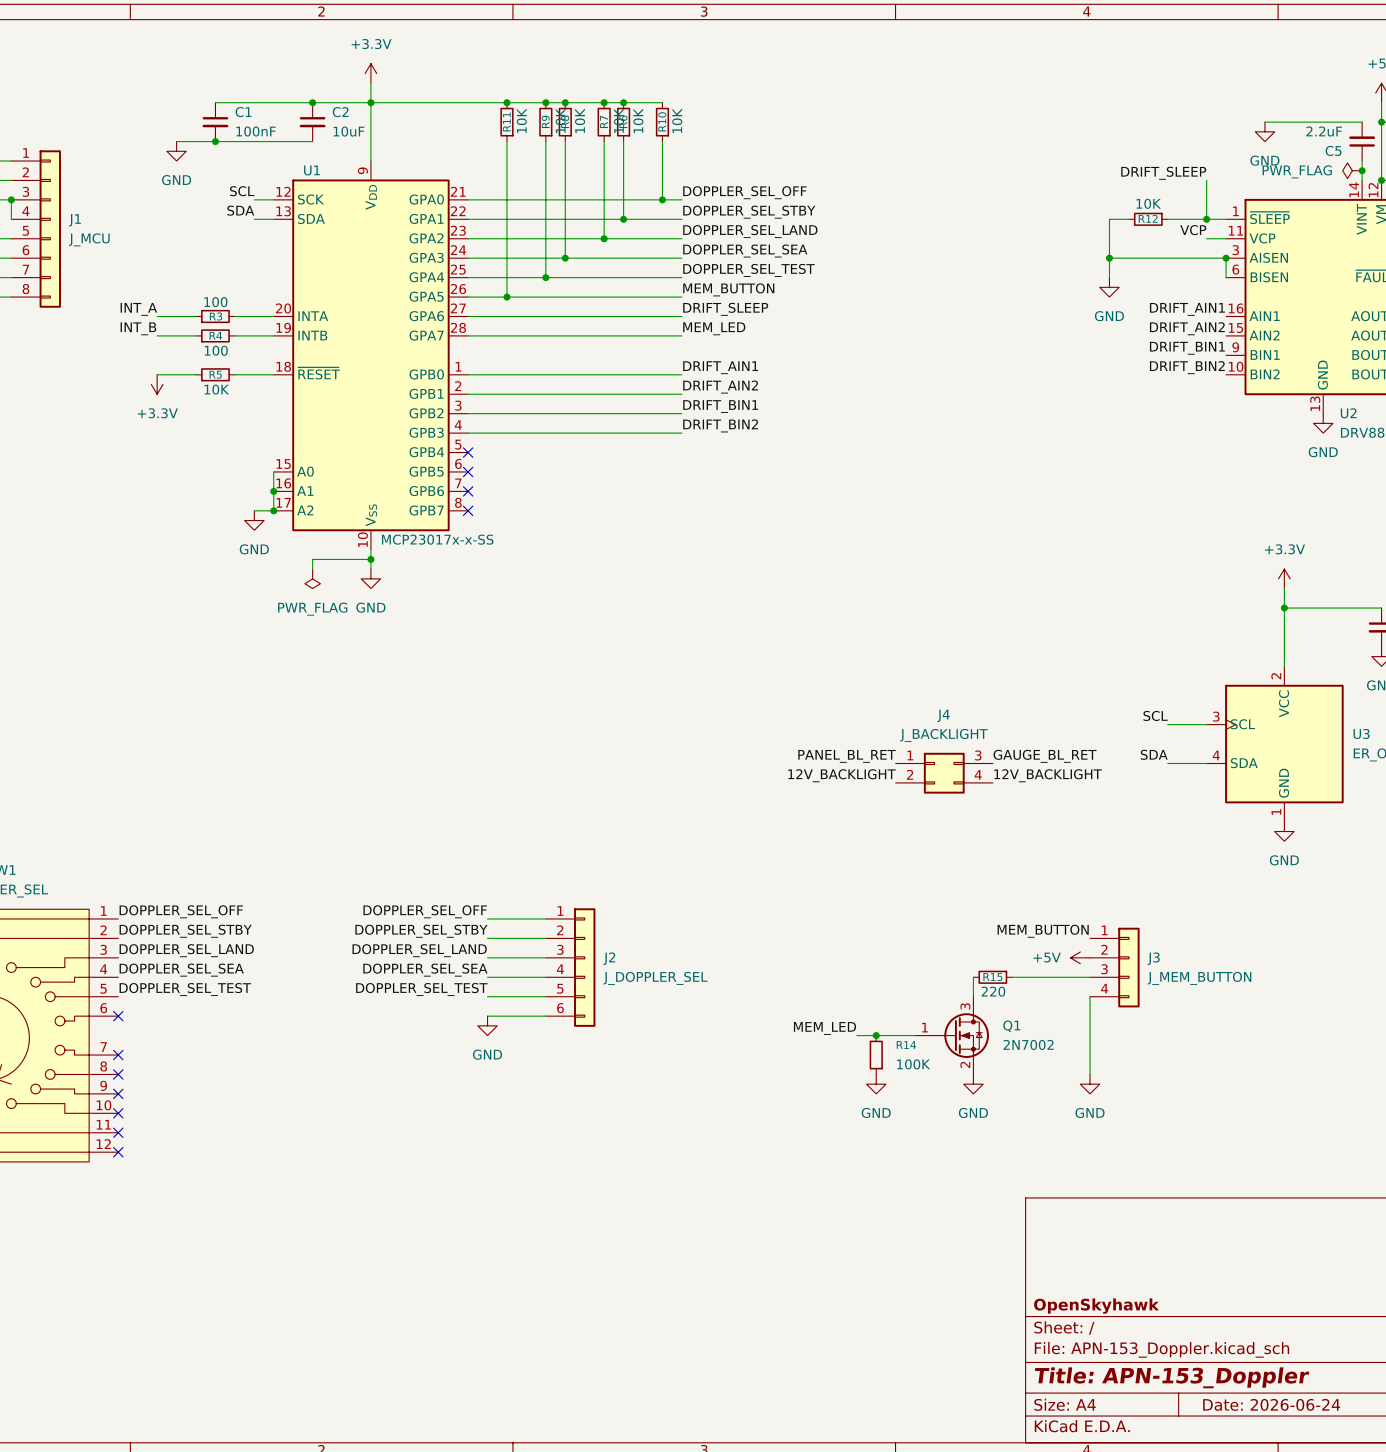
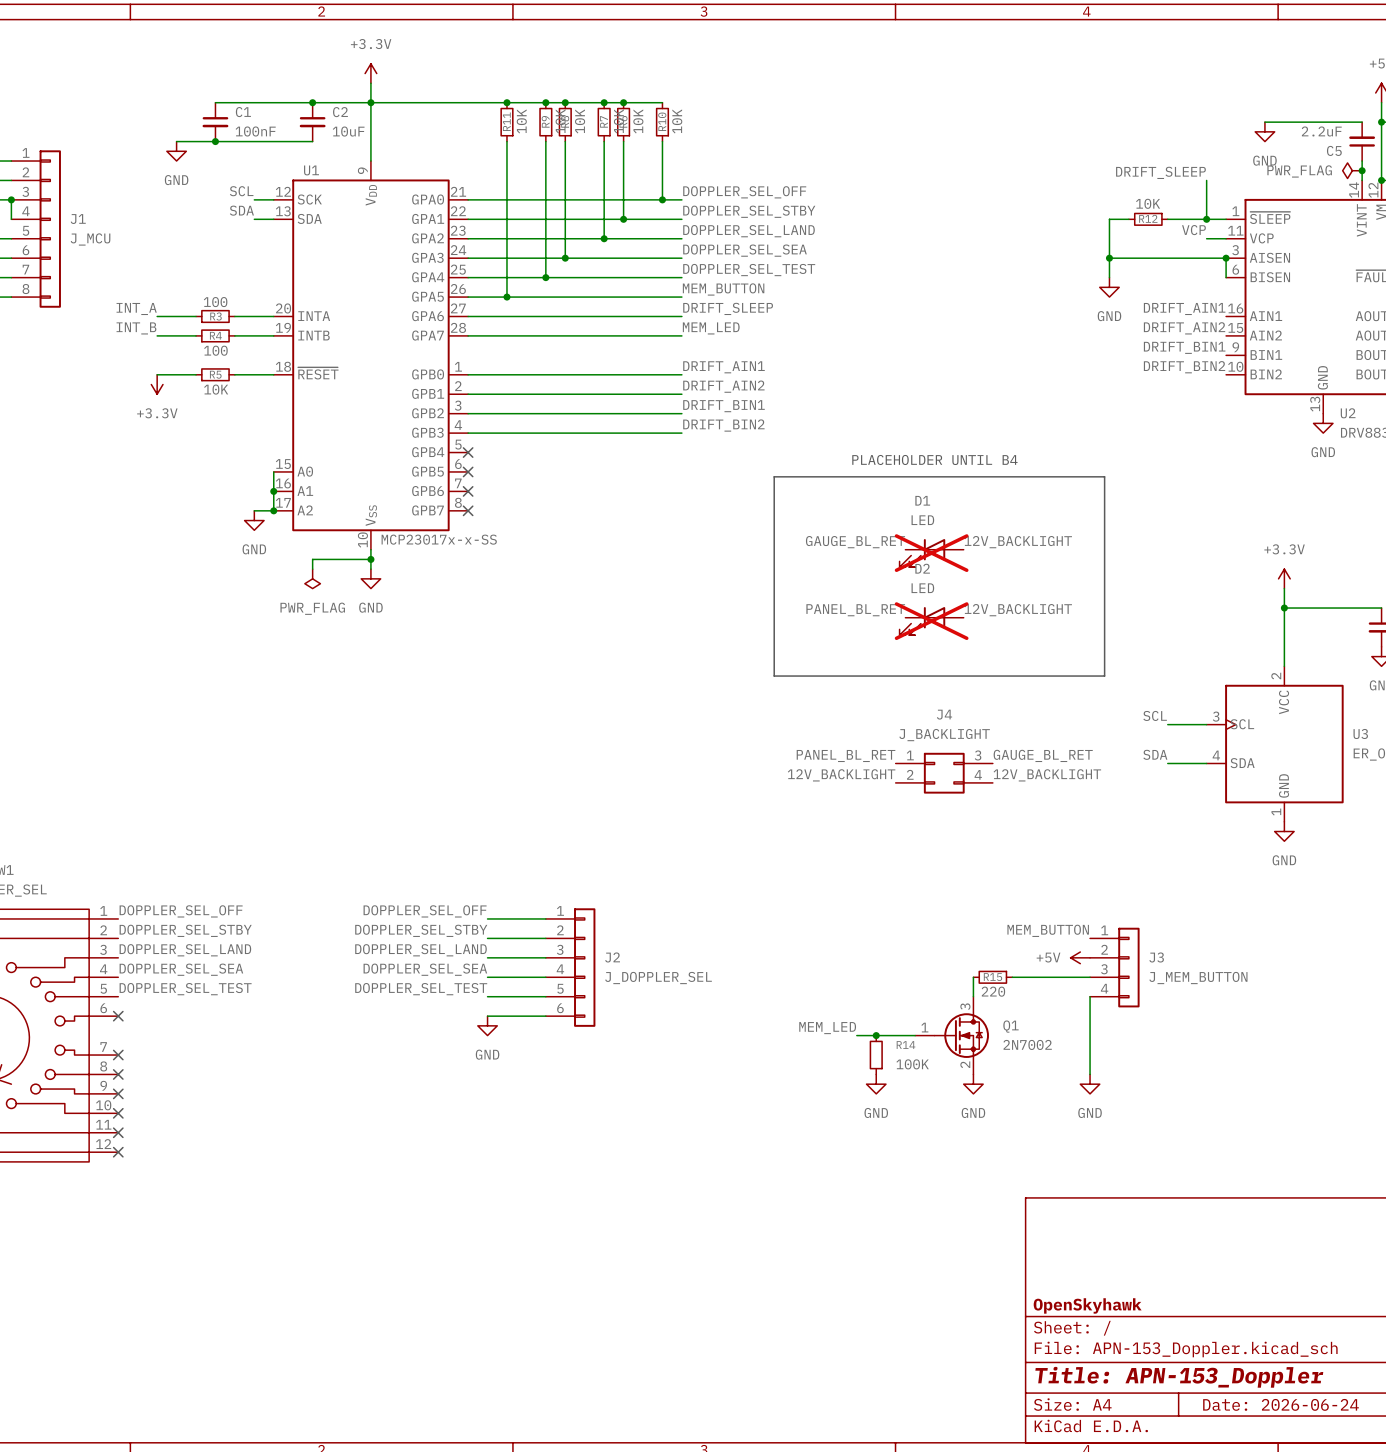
text: none -> PLACEHOLDER UNTIL B4 (934, 459)
line: none -> (774, 476) (1104, 476) (1104, 676) (774, 676) (774, 476)
label: none -> GAUGE_BL_RET (855, 542)
label: none -> 12V_BACKLIGHT (1018, 542)
D1: none -> LED (931, 553)
label: none -> PANEL_BL_RET (855, 610)
label: none -> 12V_BACKLIGHT (1018, 610)
D2: none -> LED (931, 621)

